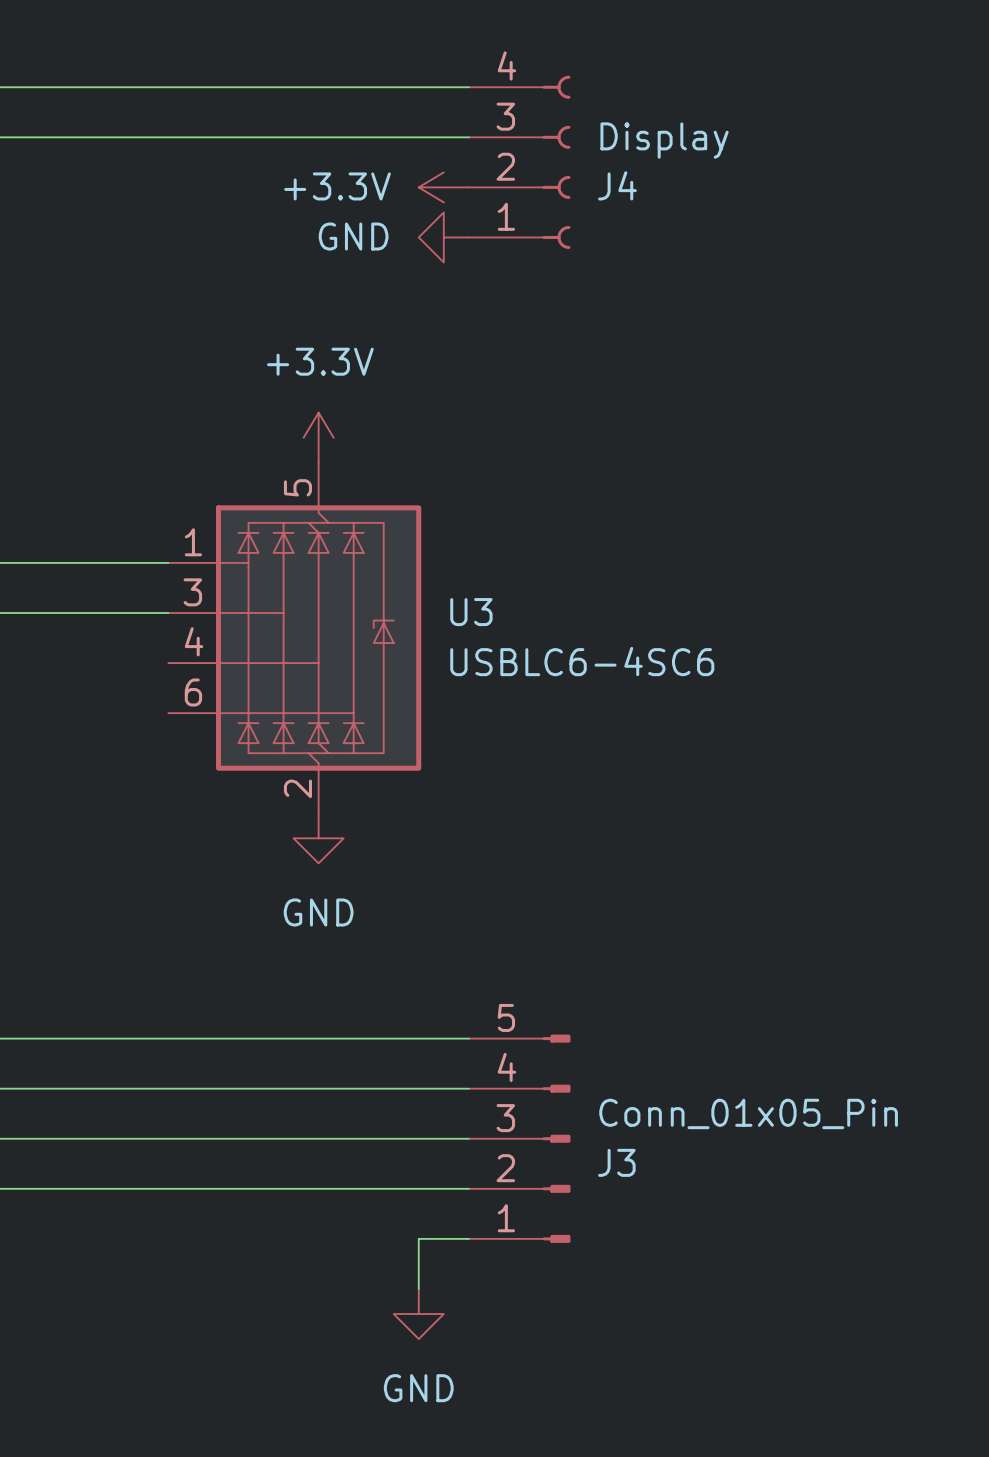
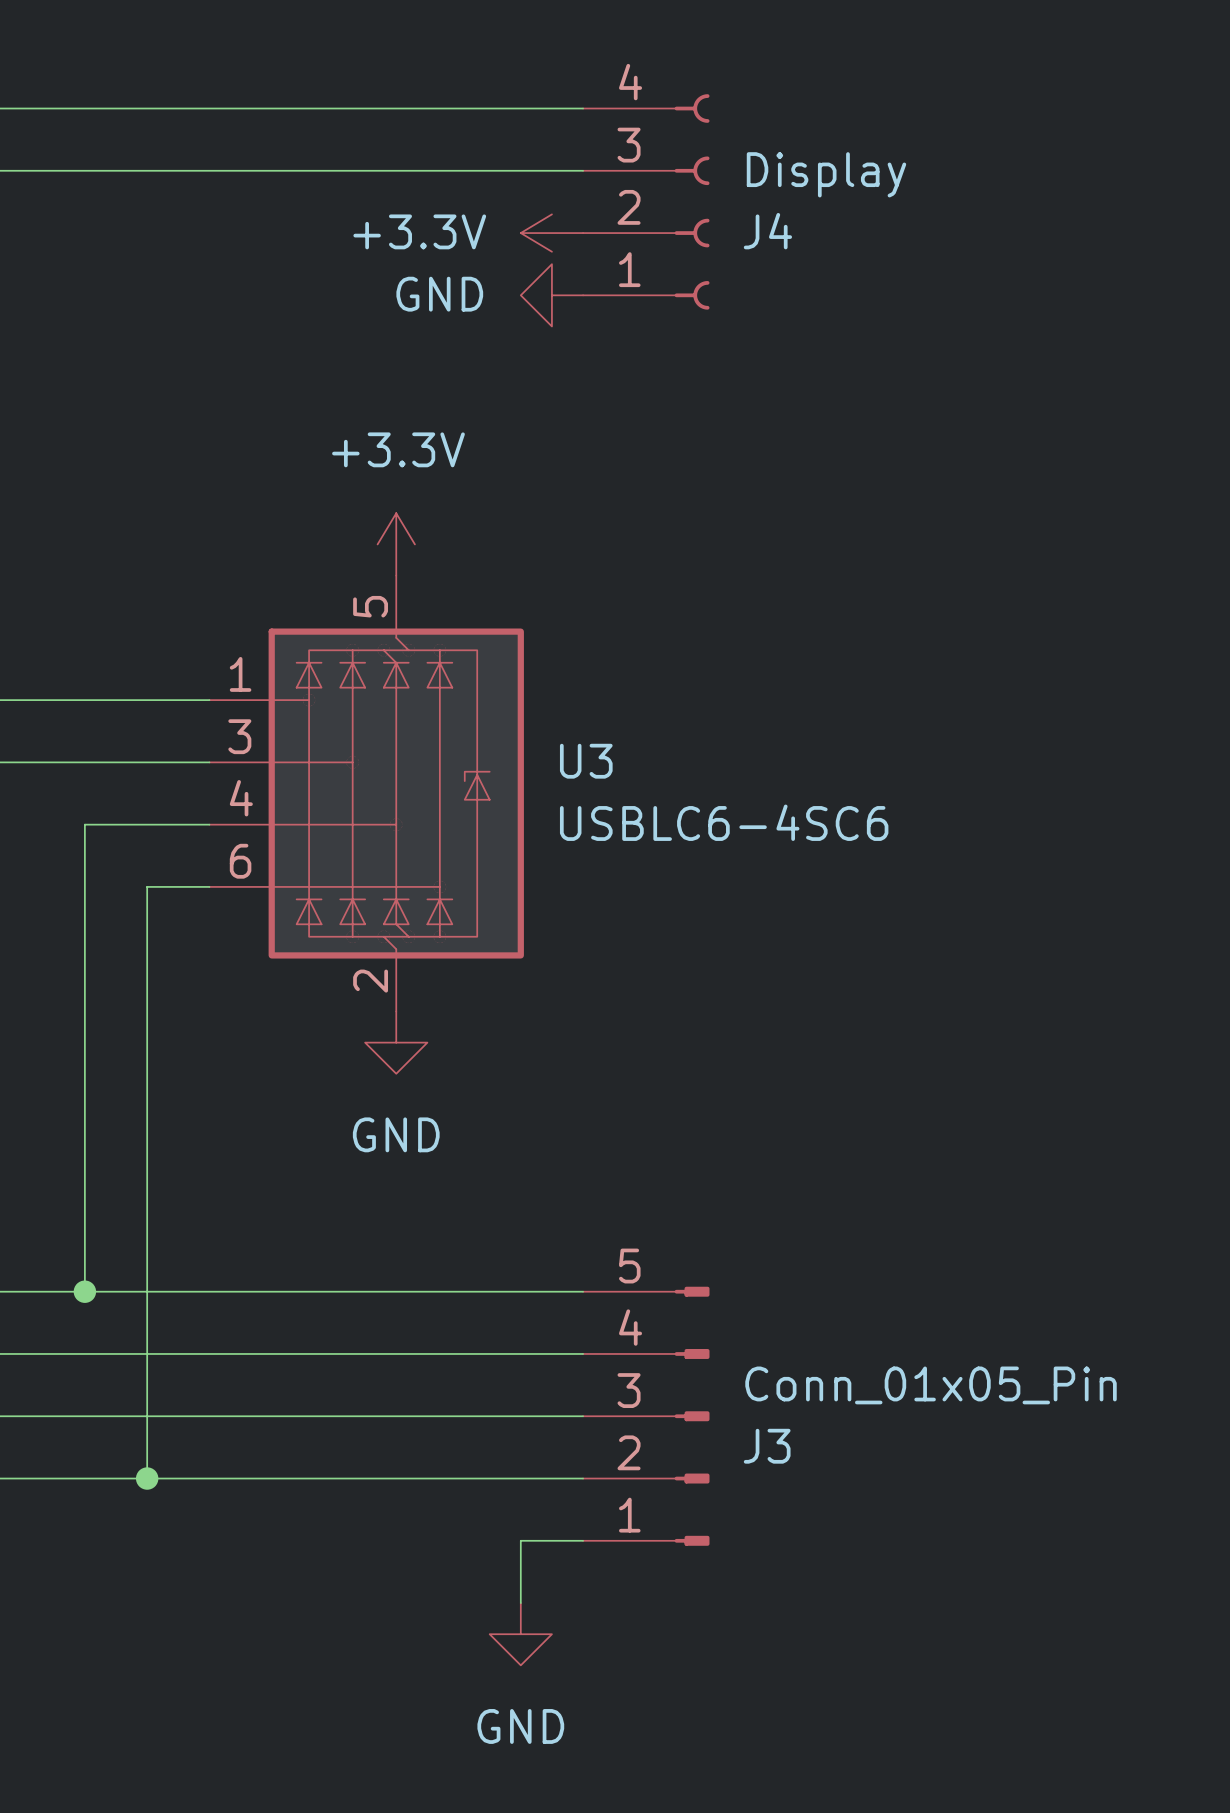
wire: none -> (209, 824) (84, 824) (84, 1291)
wire: none -> (209, 886) (147, 886) (147, 1478)
junction: none -> (84, 1291)
junction: none -> (147, 1478)

